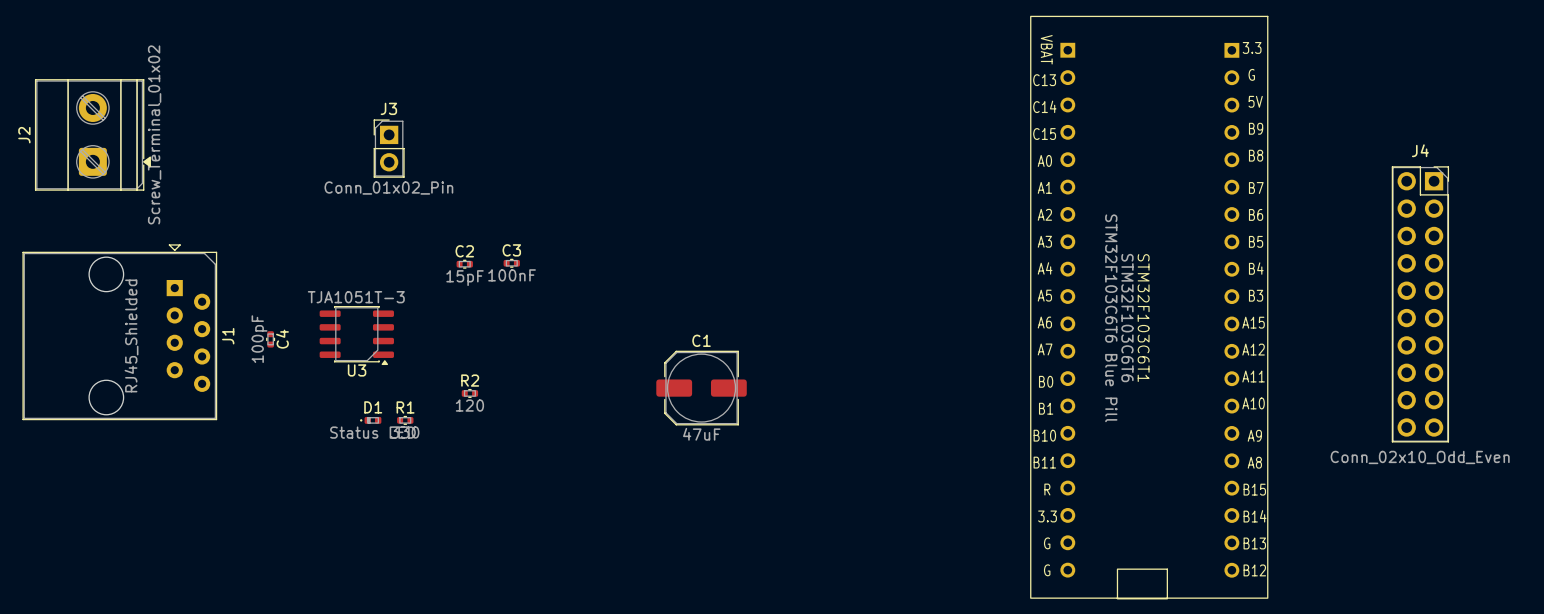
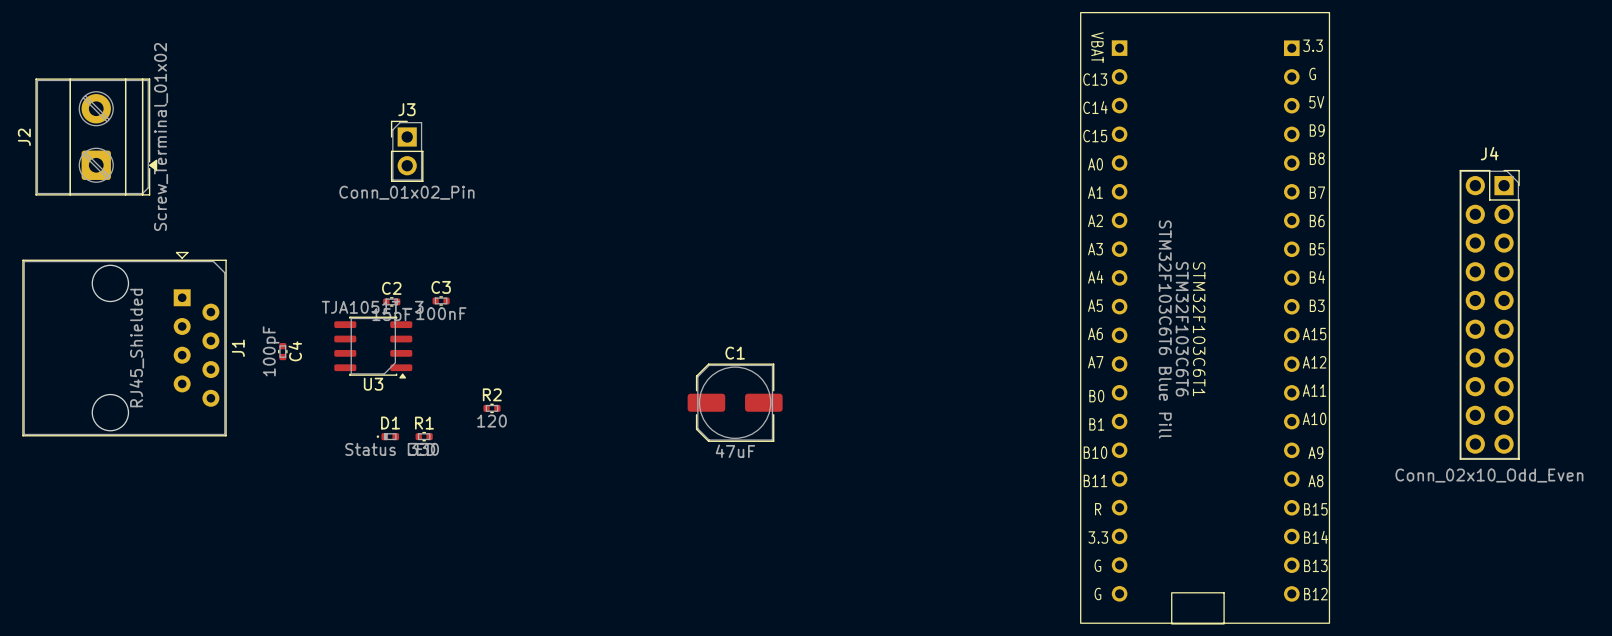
C3 position: (511, 263) -> (441, 300)
C2 position: (464, 264) -> (391, 301)

